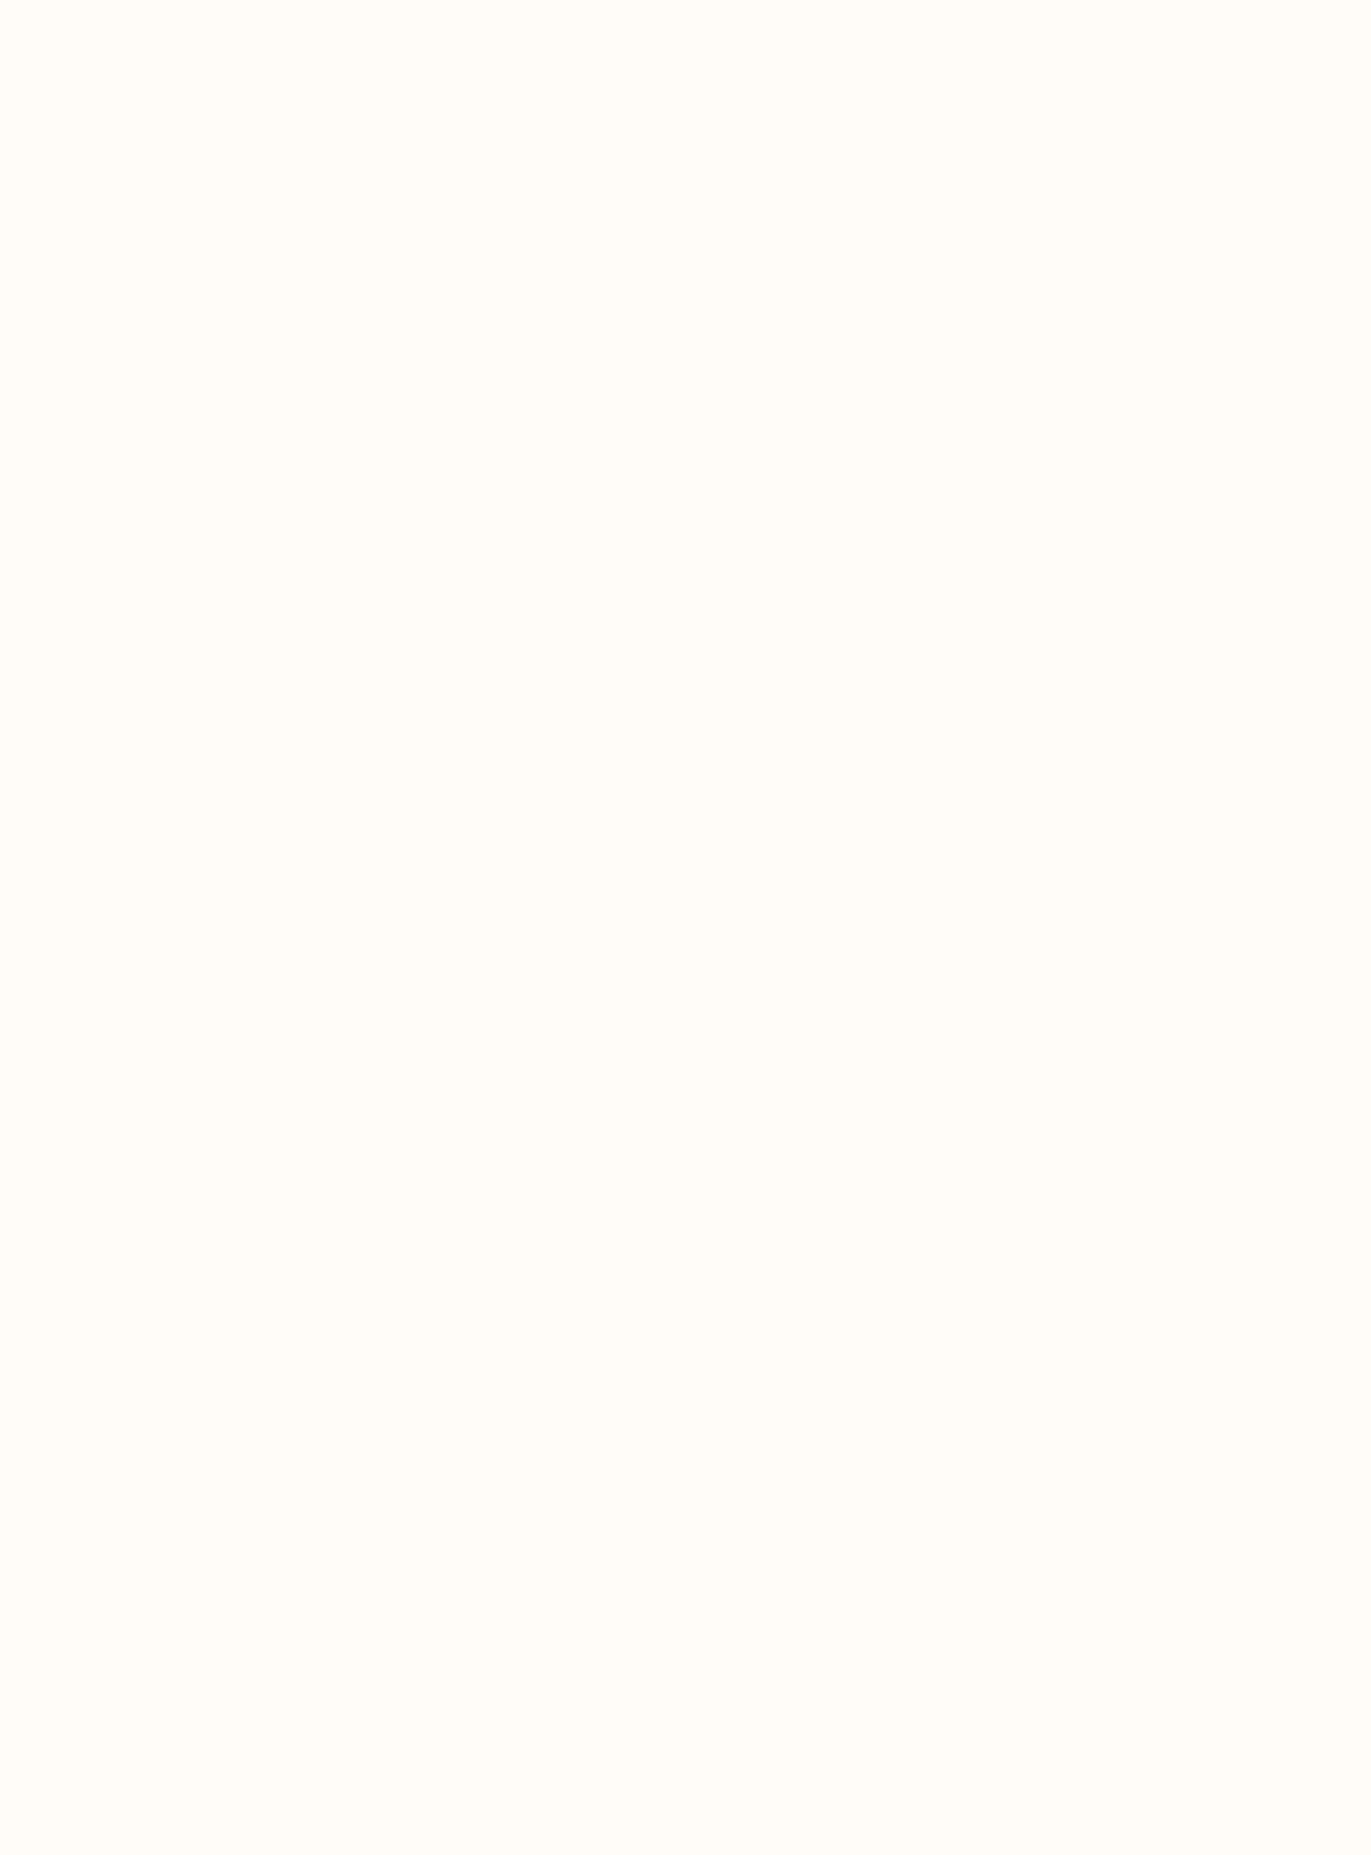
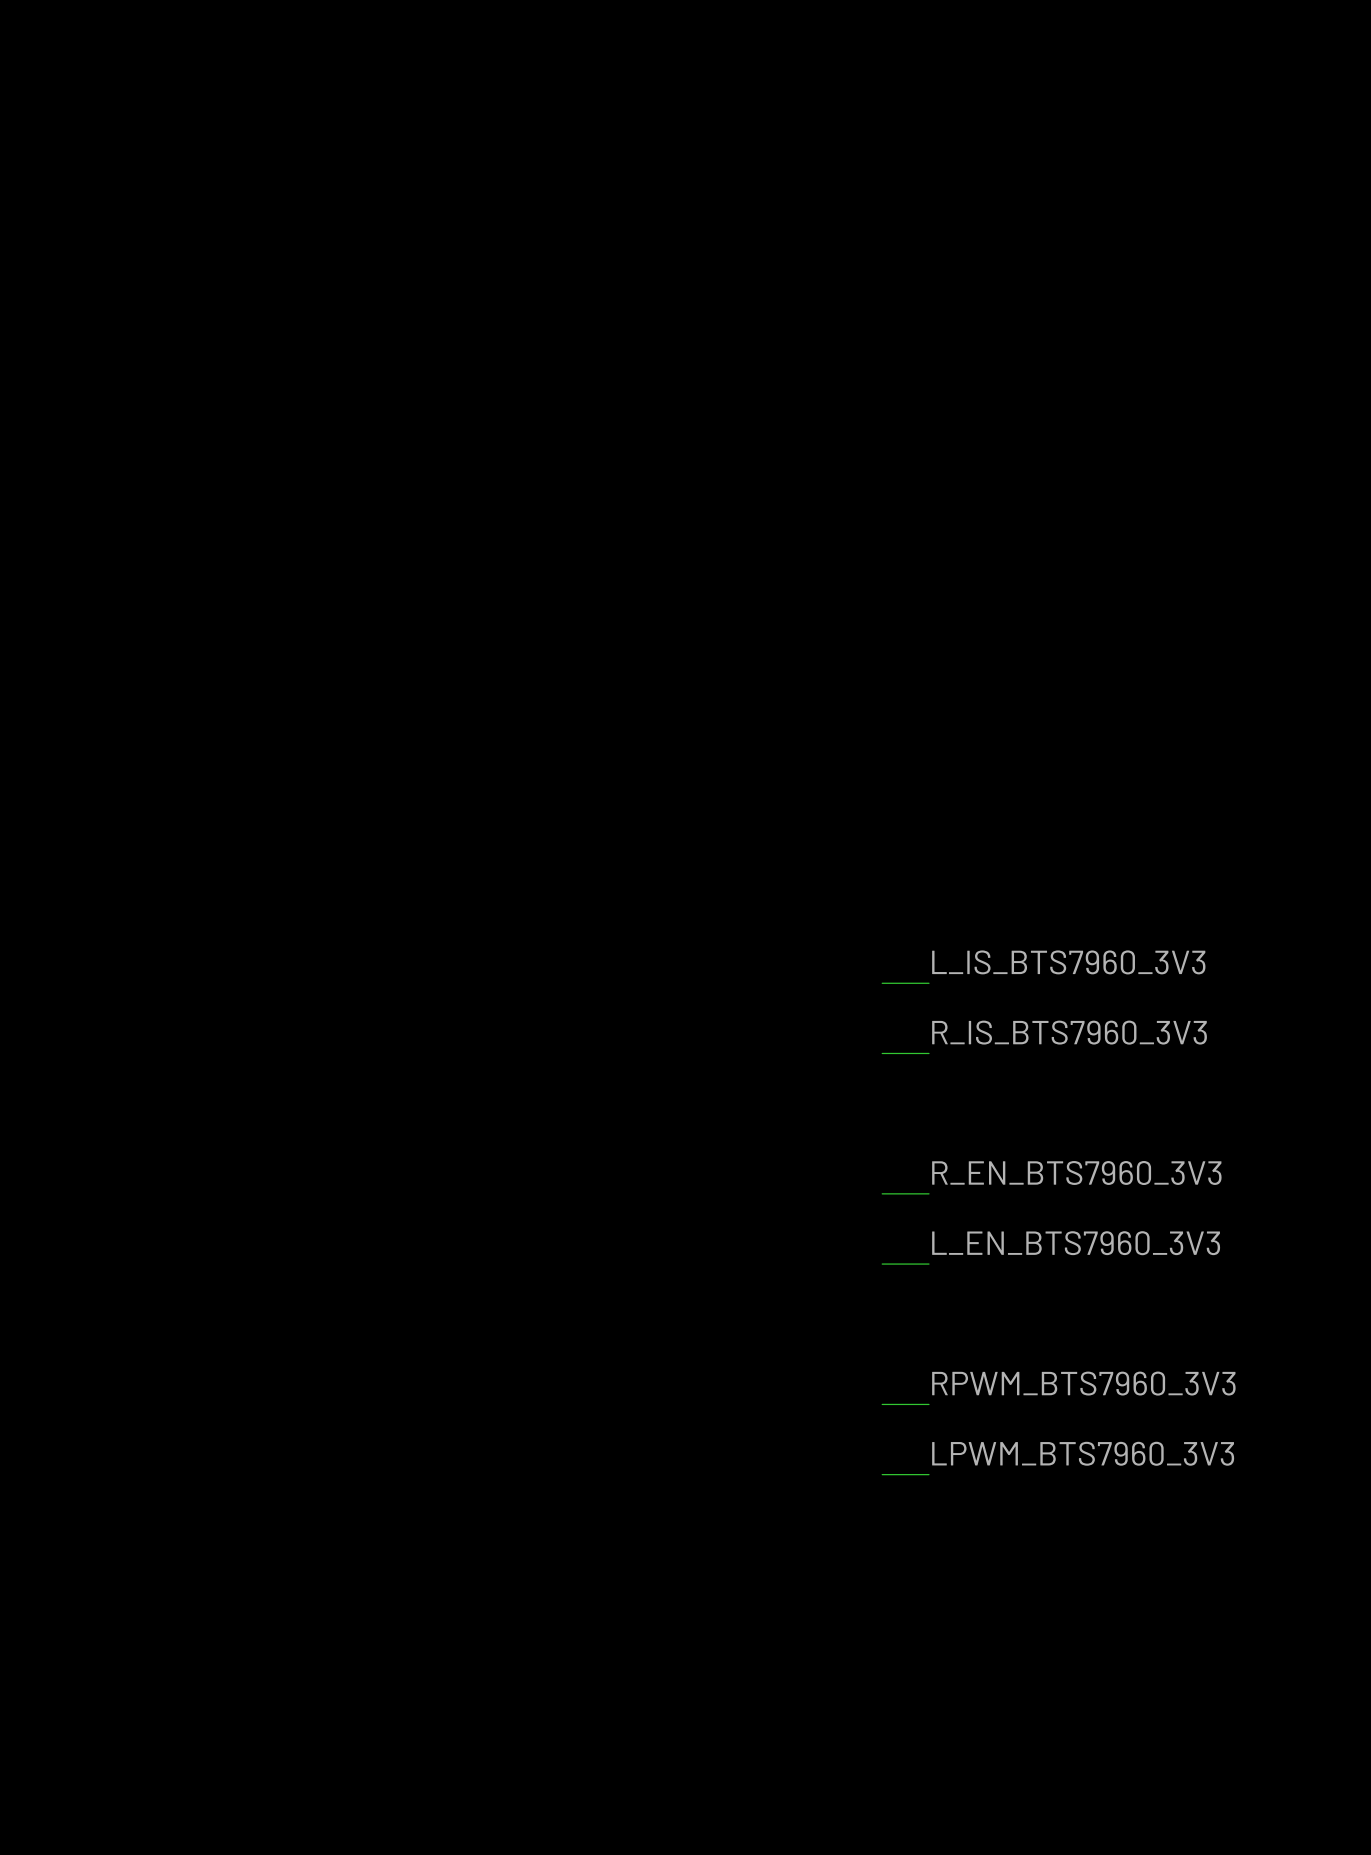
label: none -> L_IS_BTS7960_3V3 (1068, 962)
wire: none -> (882, 983) (928, 983)
label: none -> R_IS_BTS7960_3V3 (1069, 1032)
wire: none -> (882, 1053) (928, 1053)
label: none -> R_EN_BTS7960_3V3 (1076, 1172)
wire: none -> (882, 1193) (928, 1193)
label: none -> L_EN_BTS7960_3V3 (1076, 1243)
wire: none -> (882, 1264) (928, 1264)
label: none -> RPWM_BTS7960_3V3 (1083, 1383)
wire: none -> (882, 1404) (928, 1404)
label: none -> LPWM_BTS7960_3V3 (1083, 1453)
wire: none -> (882, 1474) (928, 1474)

